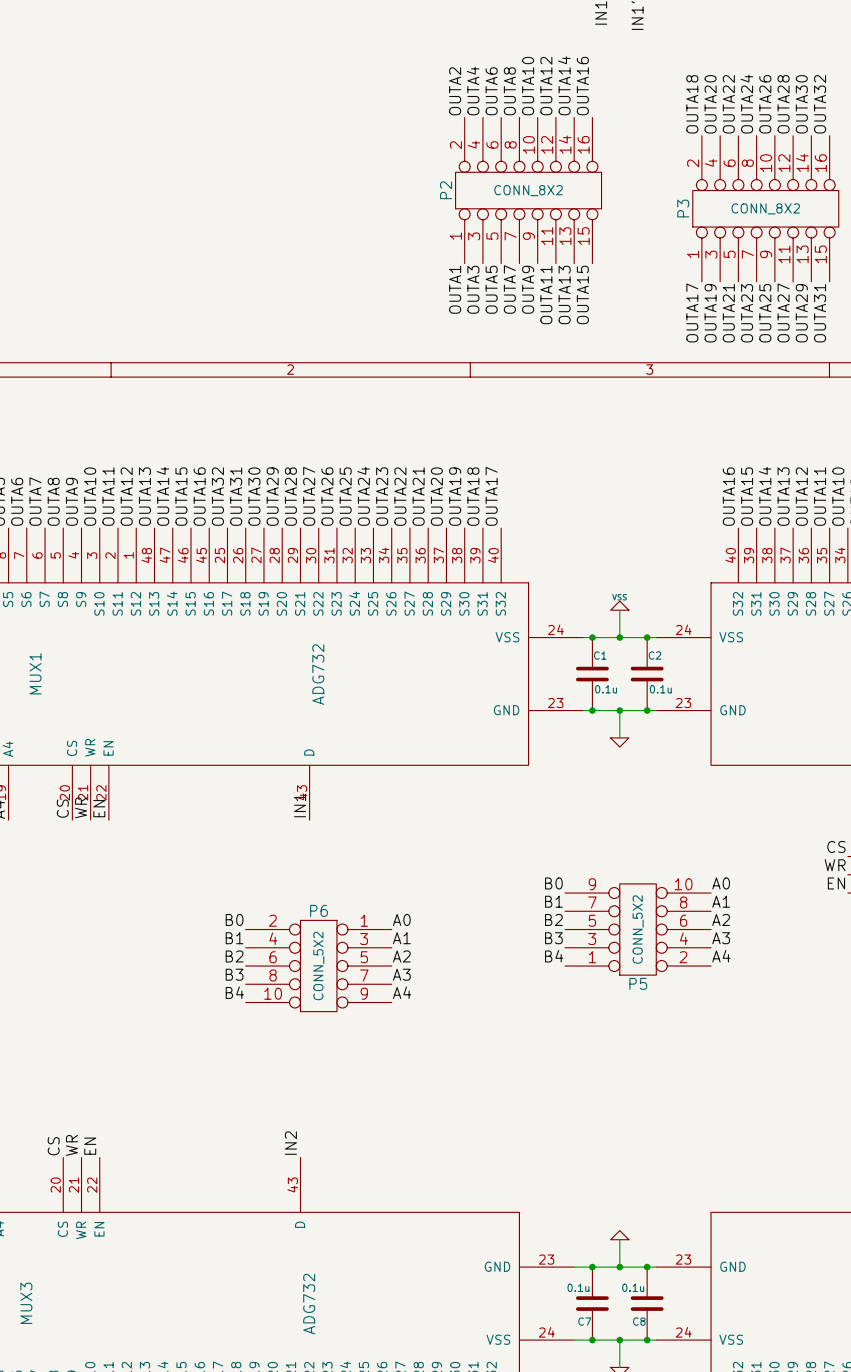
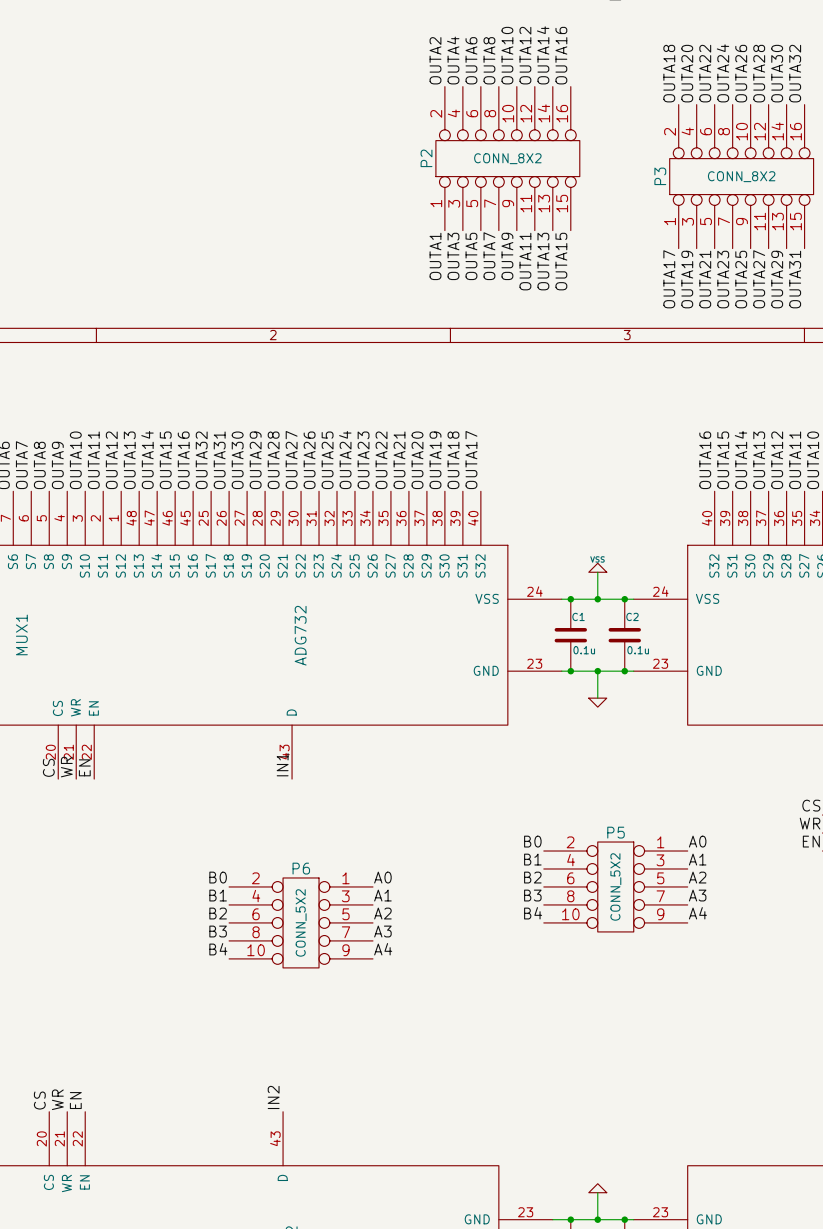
P5 rotation: 0° (638, 929) -> 180° (615, 886)

